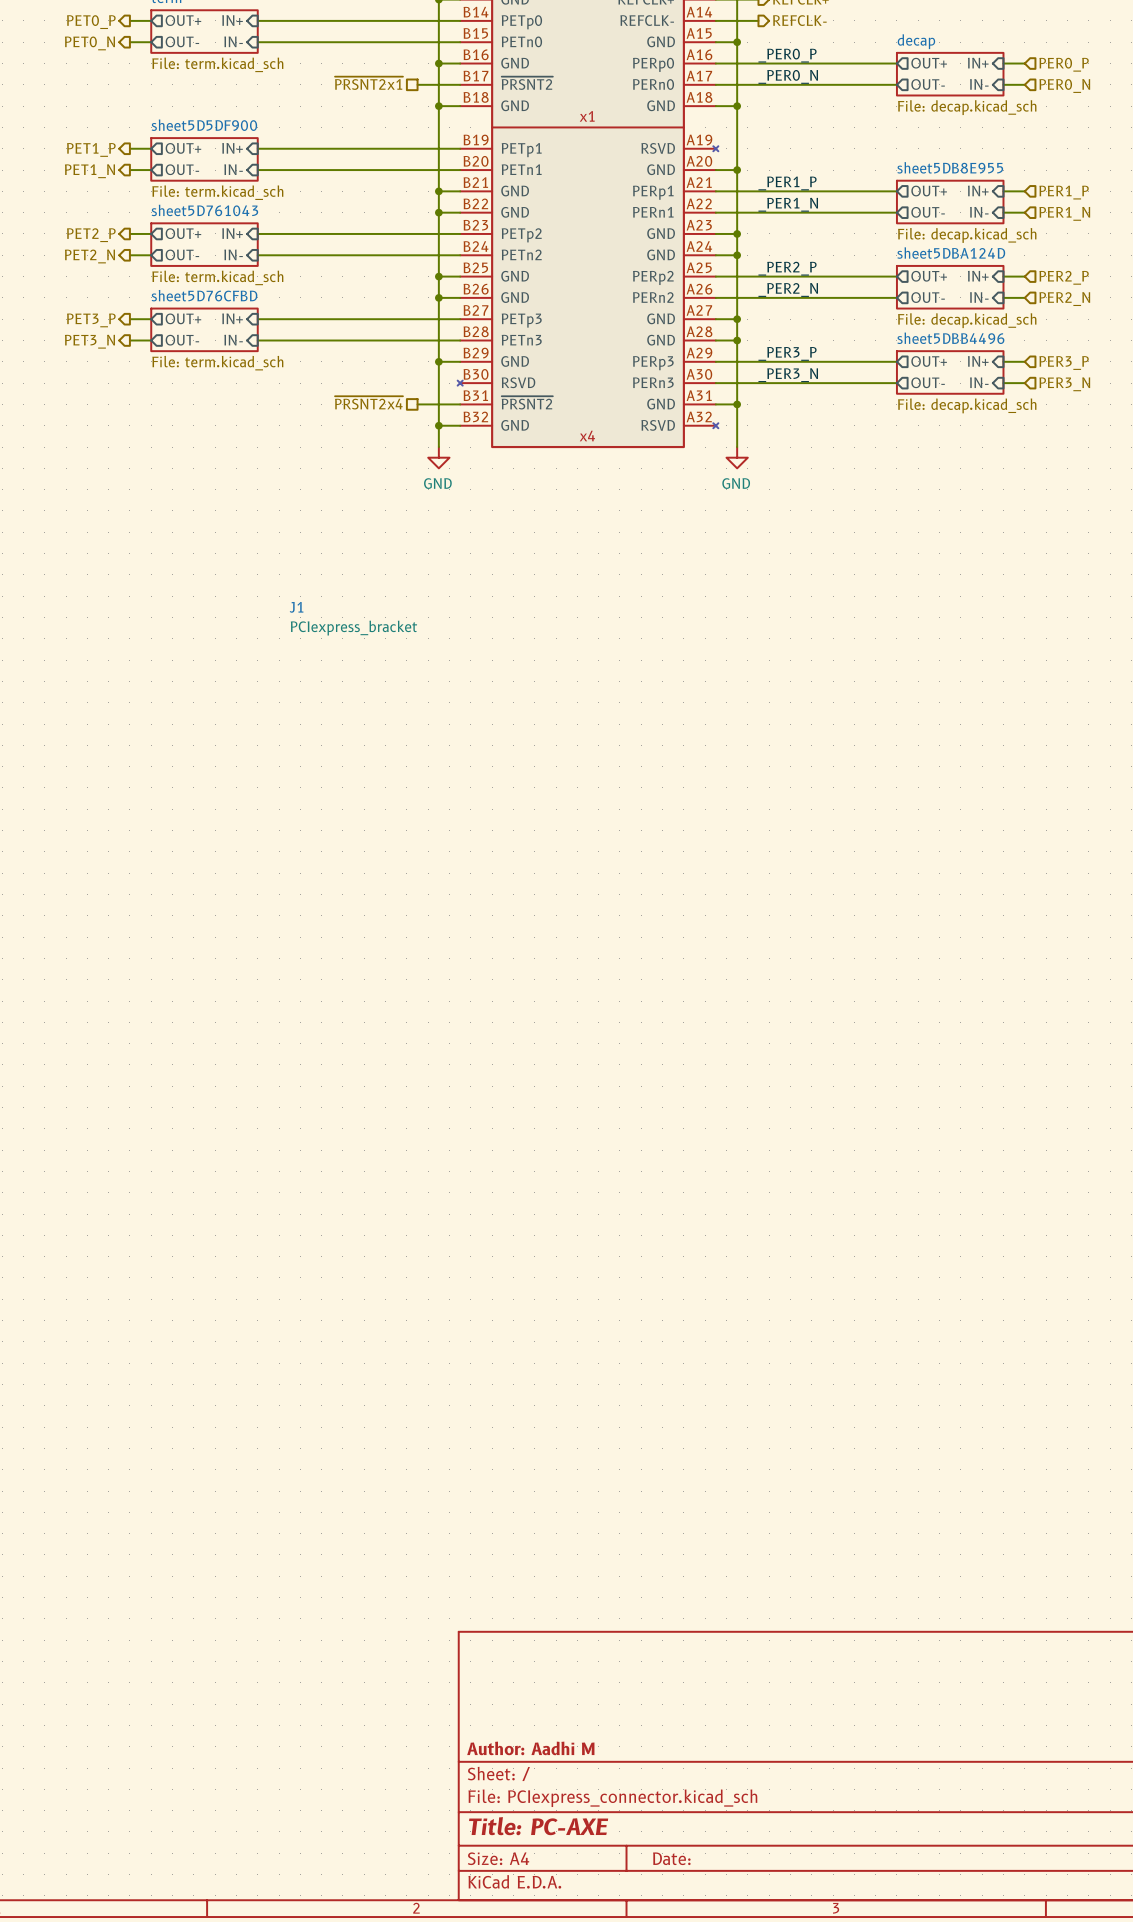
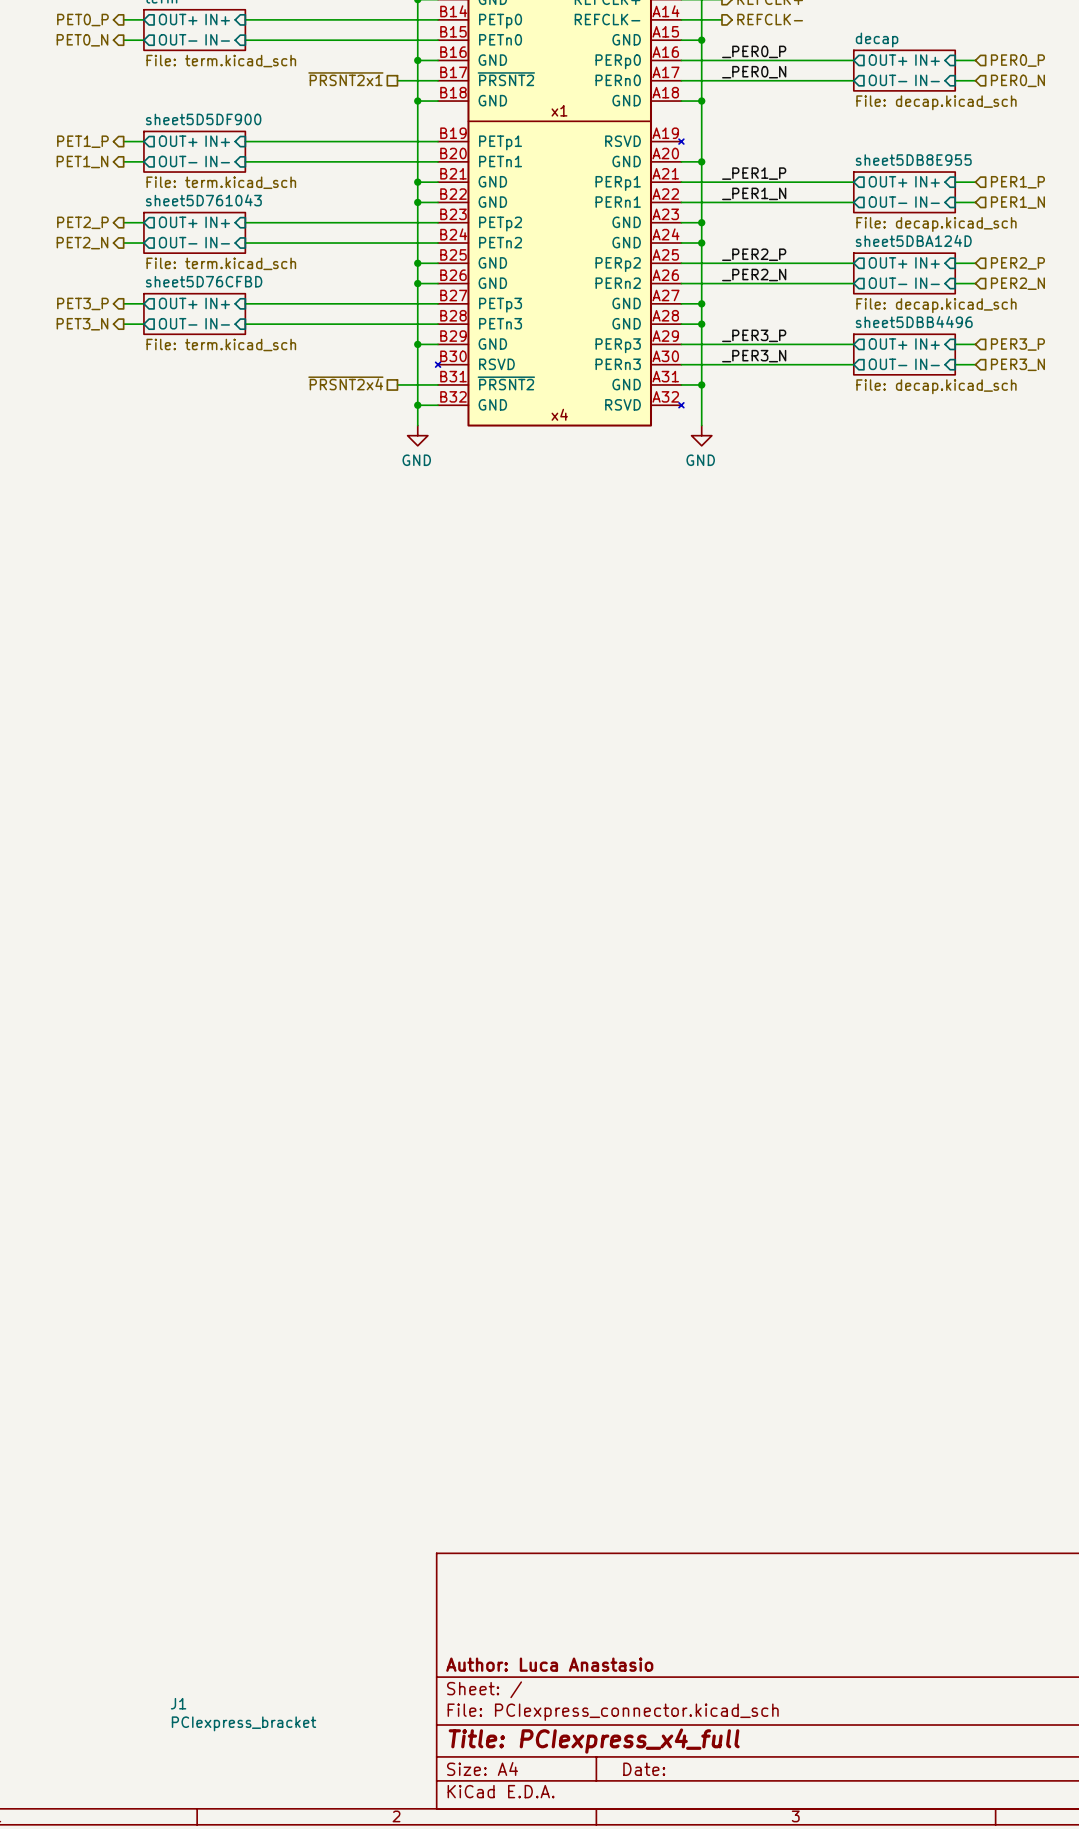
J1 position: (353, 618) -> (243, 1714)
title block: Author: Aadhi M (530, 1748) -> Author: Luca Anastasio (549, 1664)
title block: Title: PC-AXE (538, 1826) -> Title: PCIexpress_x4_full (594, 1741)

